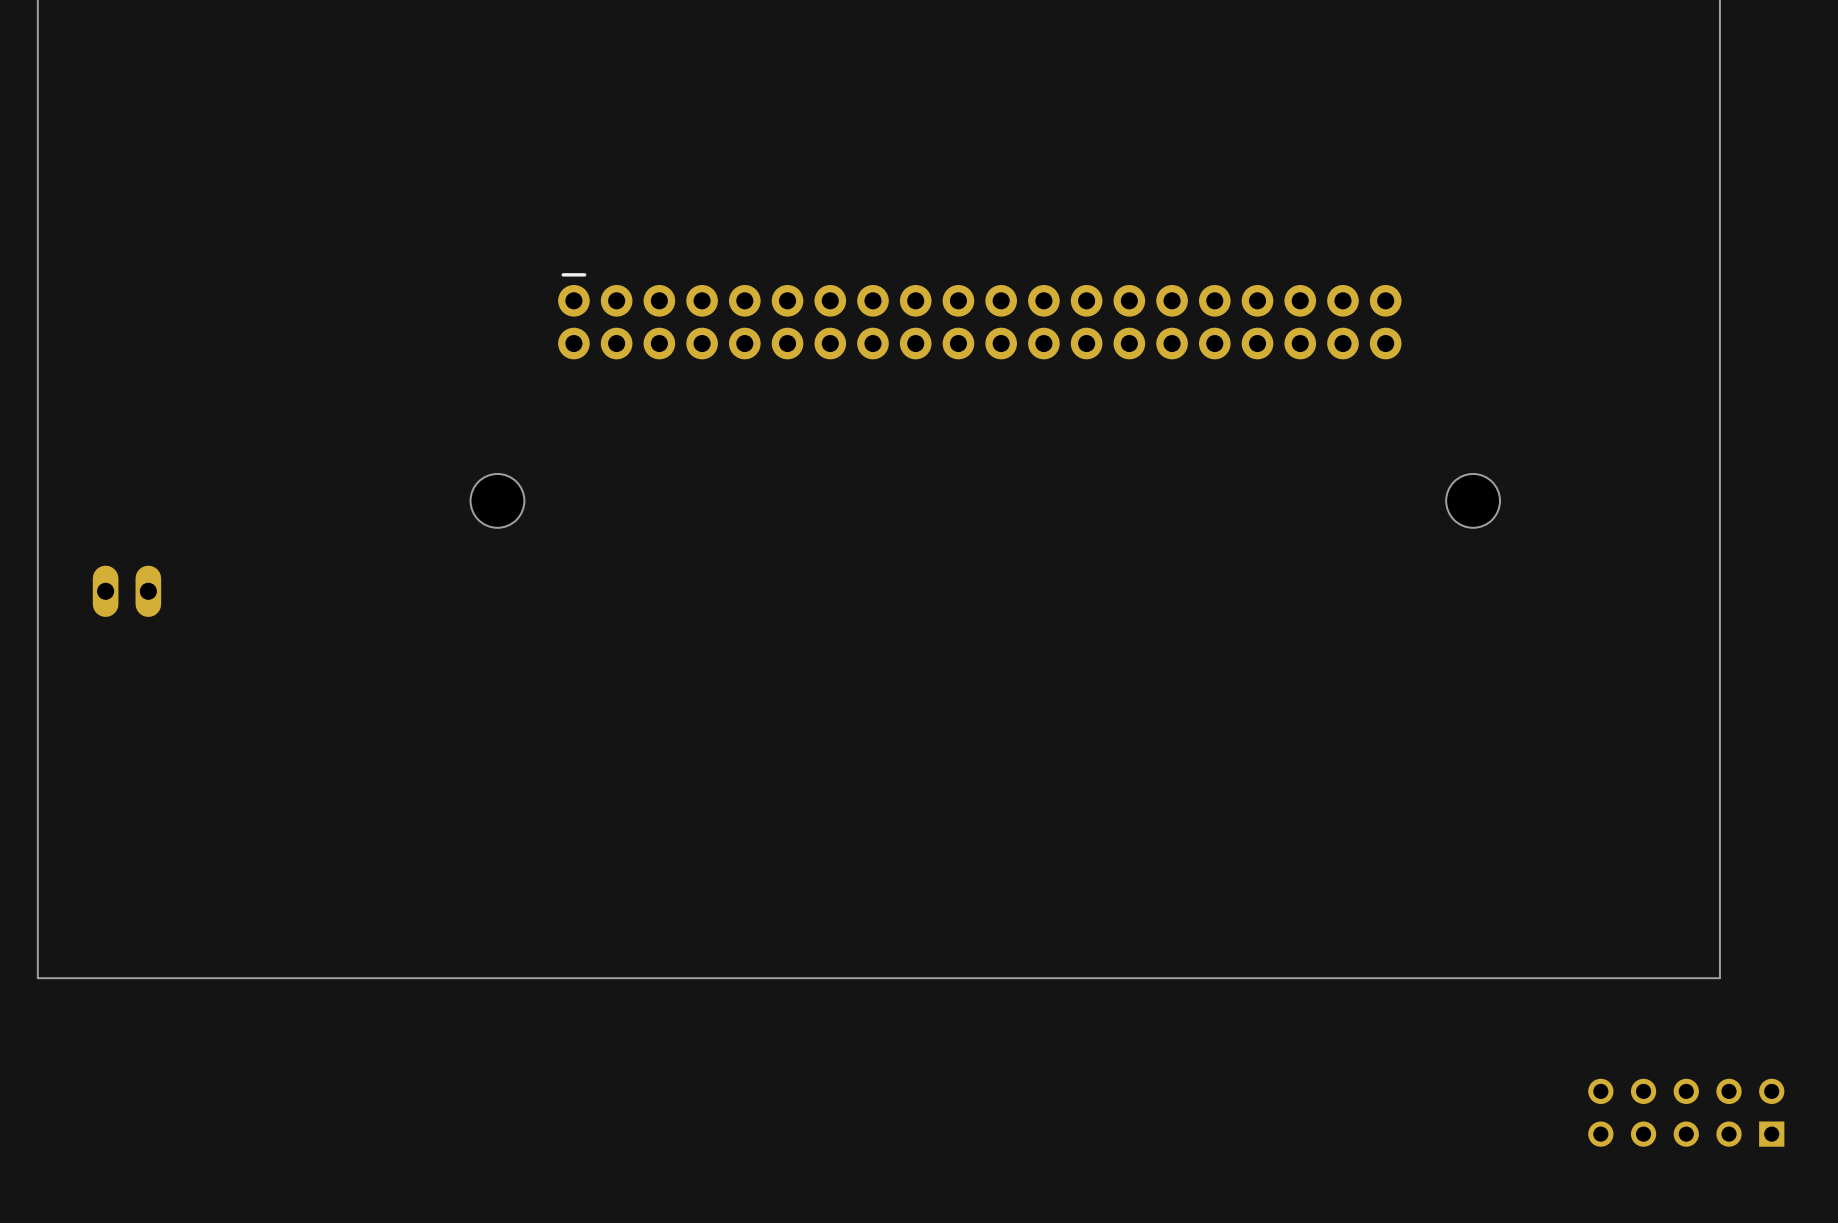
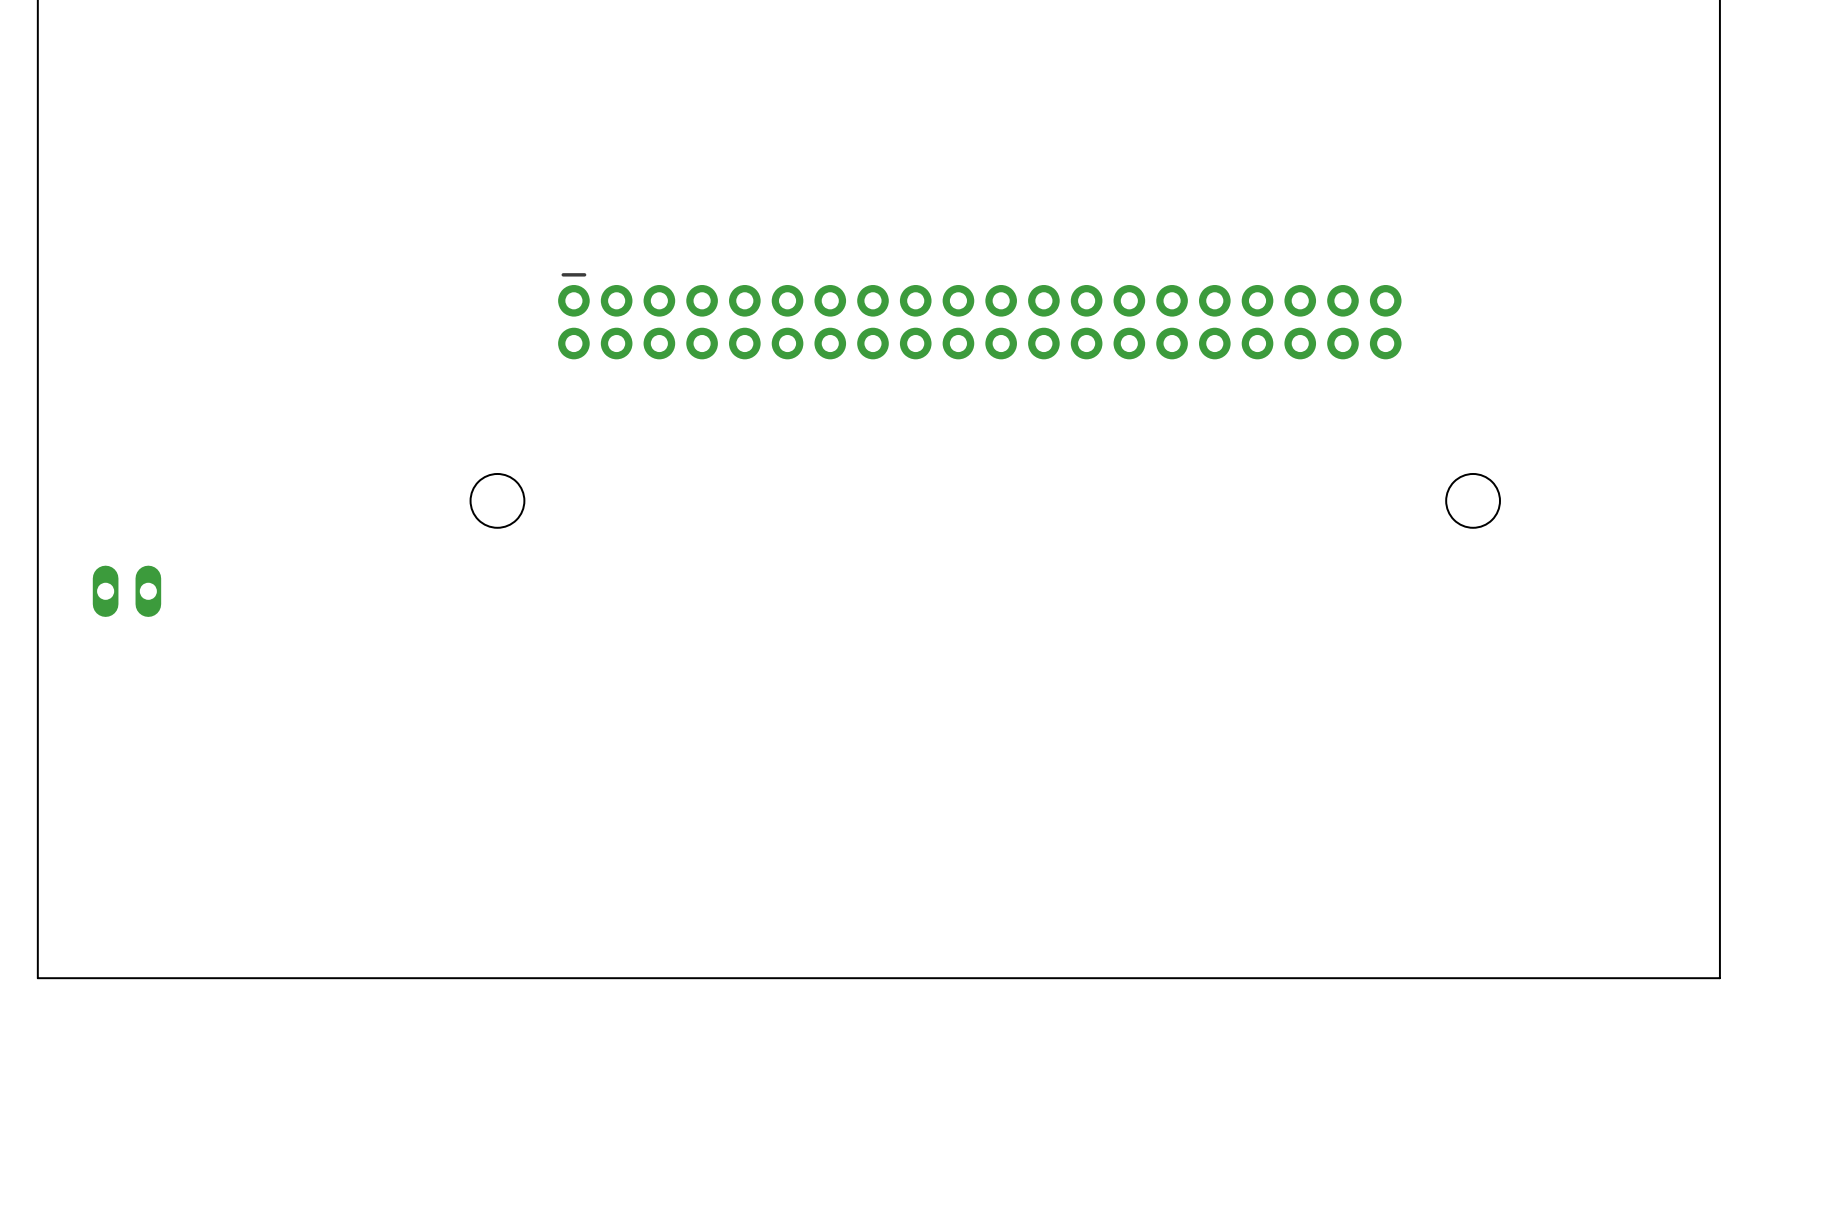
part: (1686, 1112) -> none

